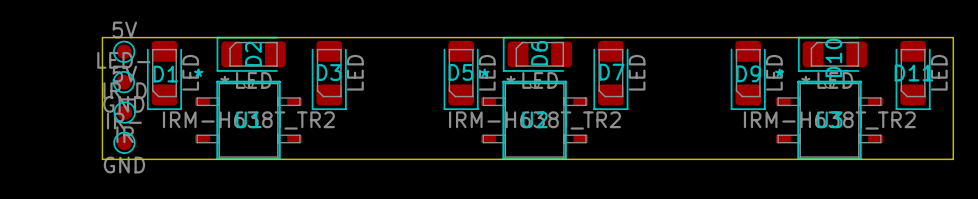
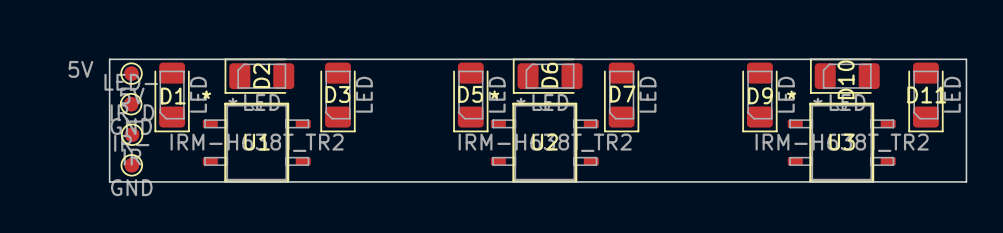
5V name position: 5V (124, 29) -> 5V (80, 69)

